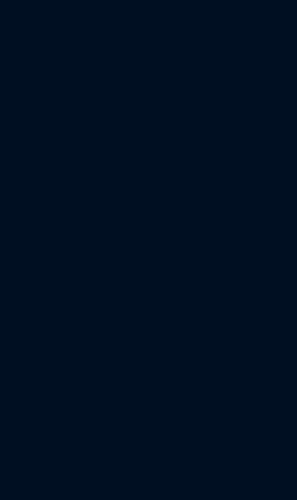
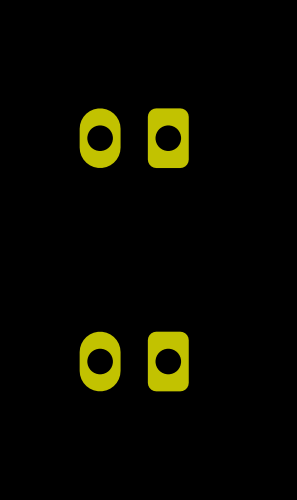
part: none -> (134, 138)
part: none -> (134, 361)

